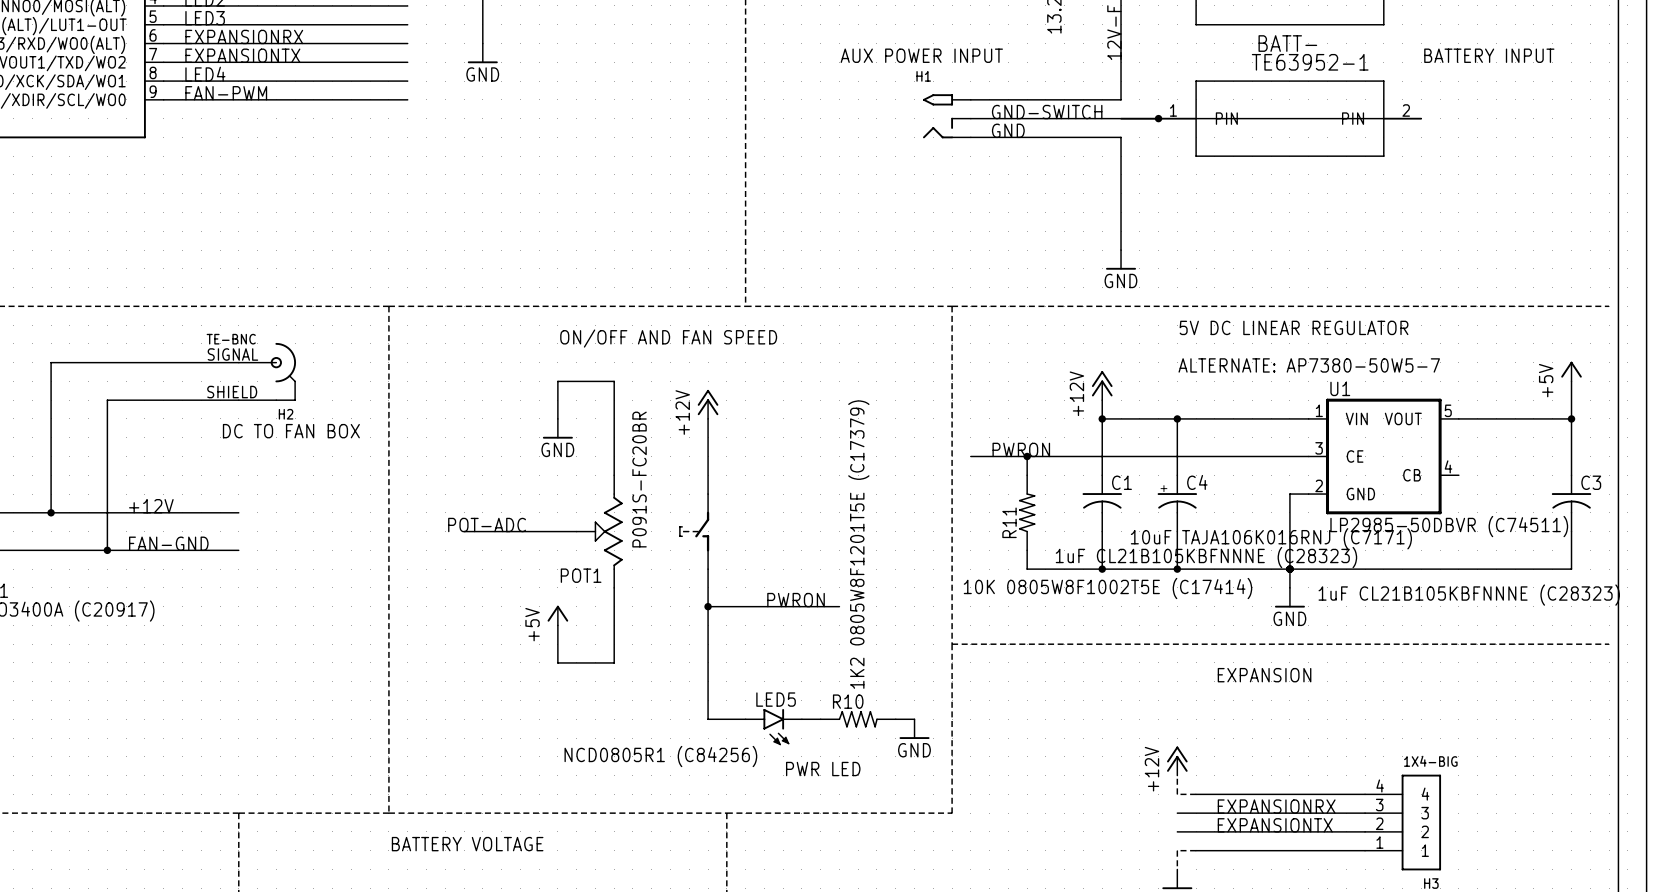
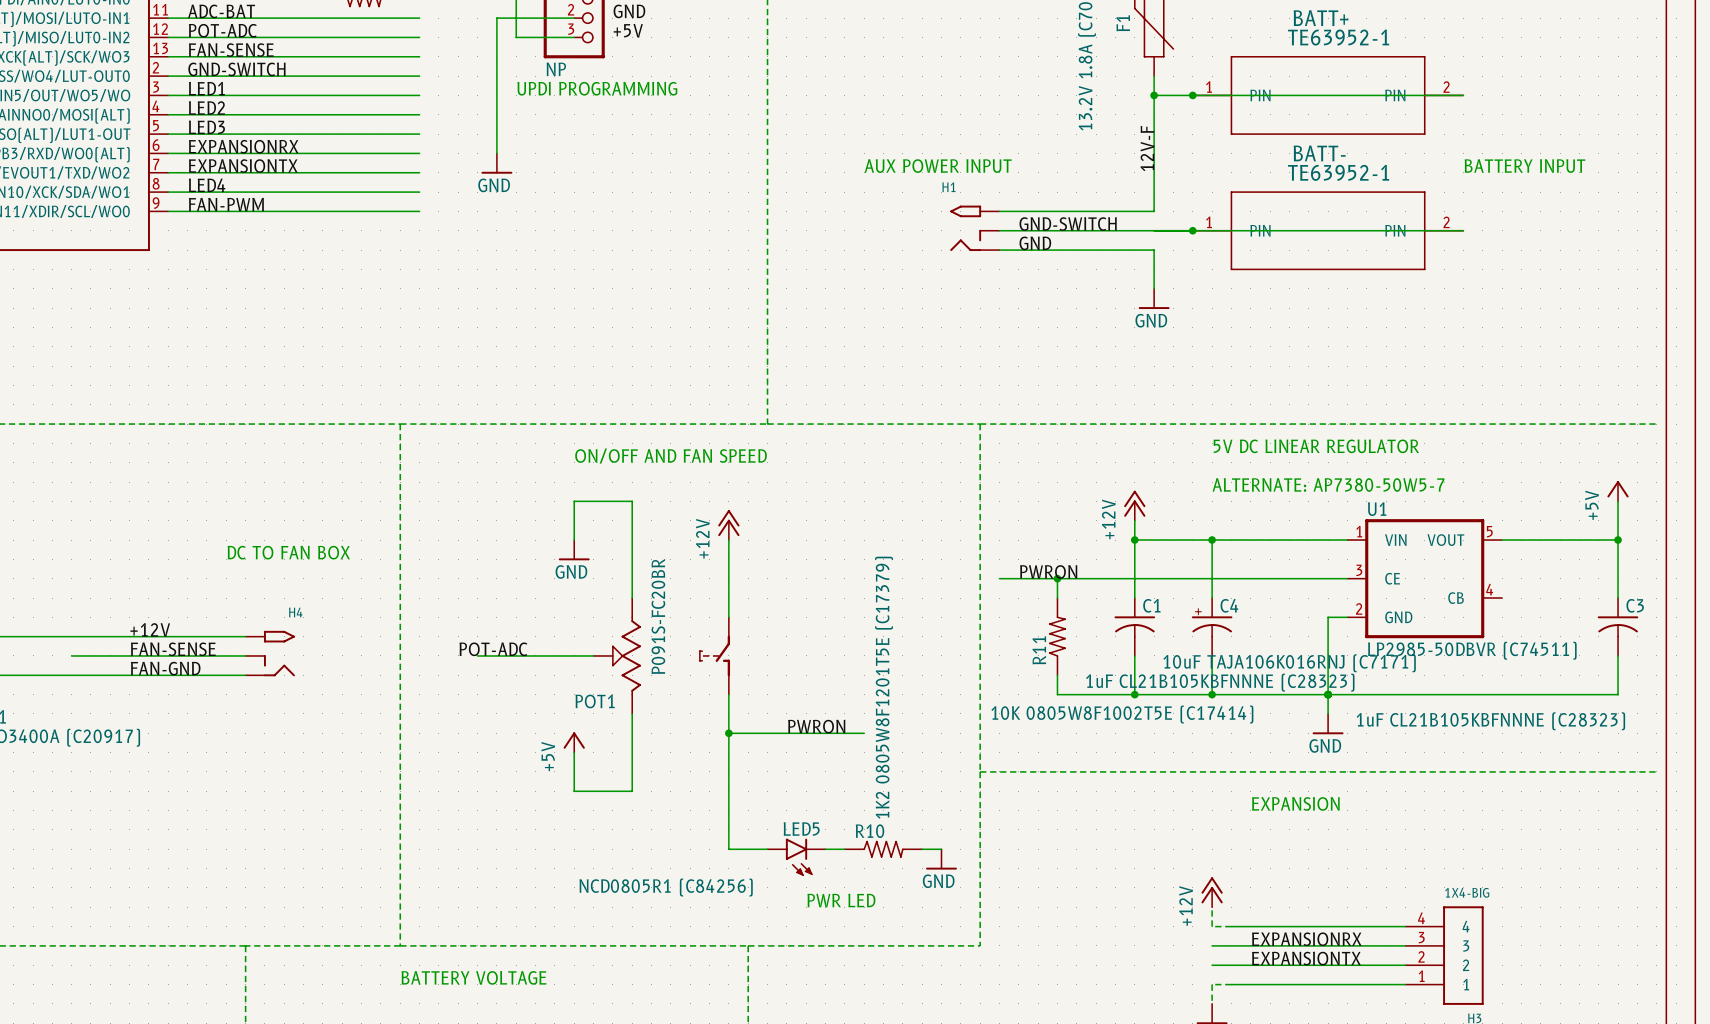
wire: (1121, 174) (1121, 250) -> none
power symbol position: GND (1121, 259) -> GND (1154, 298)
wire: (238, 362) (51, 362) (51, 512) -> none
H2: TE-BNC (267, 371) -> none
wire: (238, 400) (107, 400) (107, 550) -> none
junction: (51, 512) -> none
label: none -> FAN-SENSE (173, 649)
H4: none -> (270, 653)
wire: none -> (71, 655) (245, 655)
junction: (107, 550) -> none

